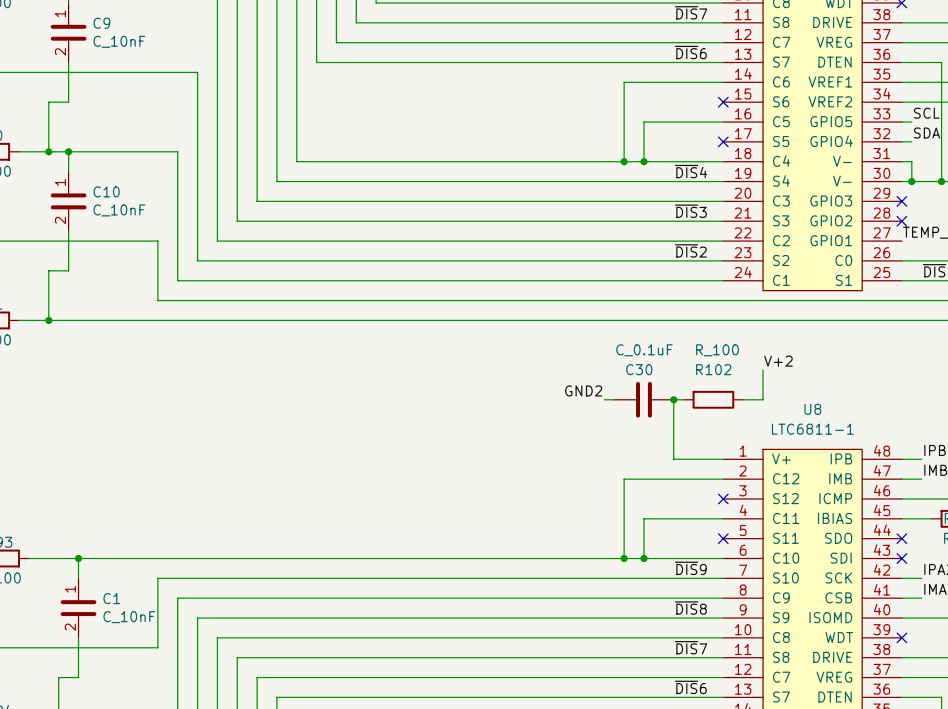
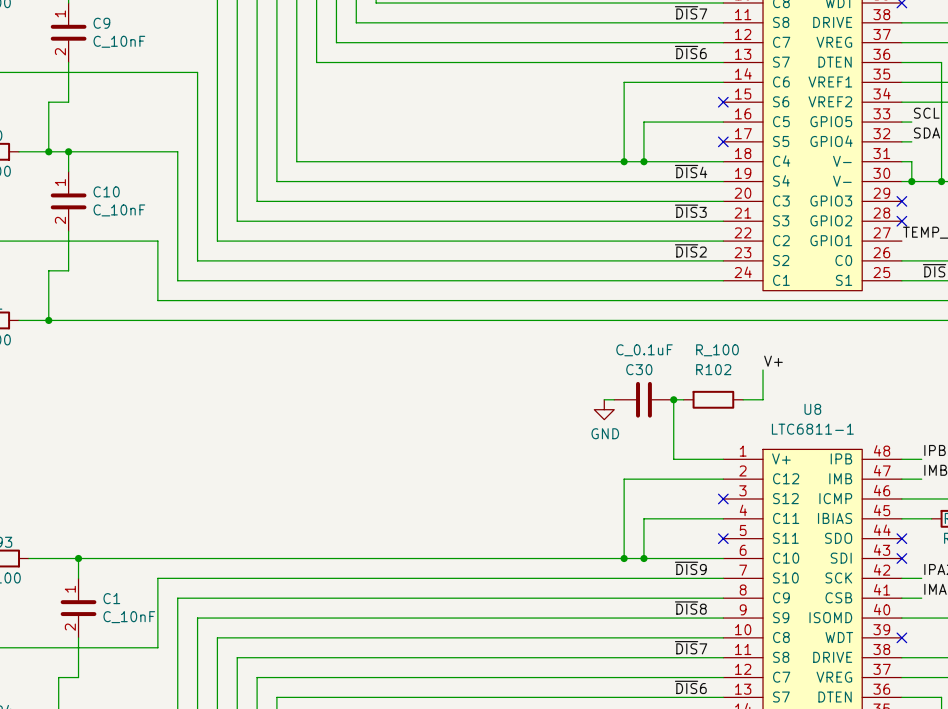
label: V+2 (778, 361) -> V+ (773, 361)
label: GND2 (583, 390) -> none
power symbol: none -> GND (604, 409)

